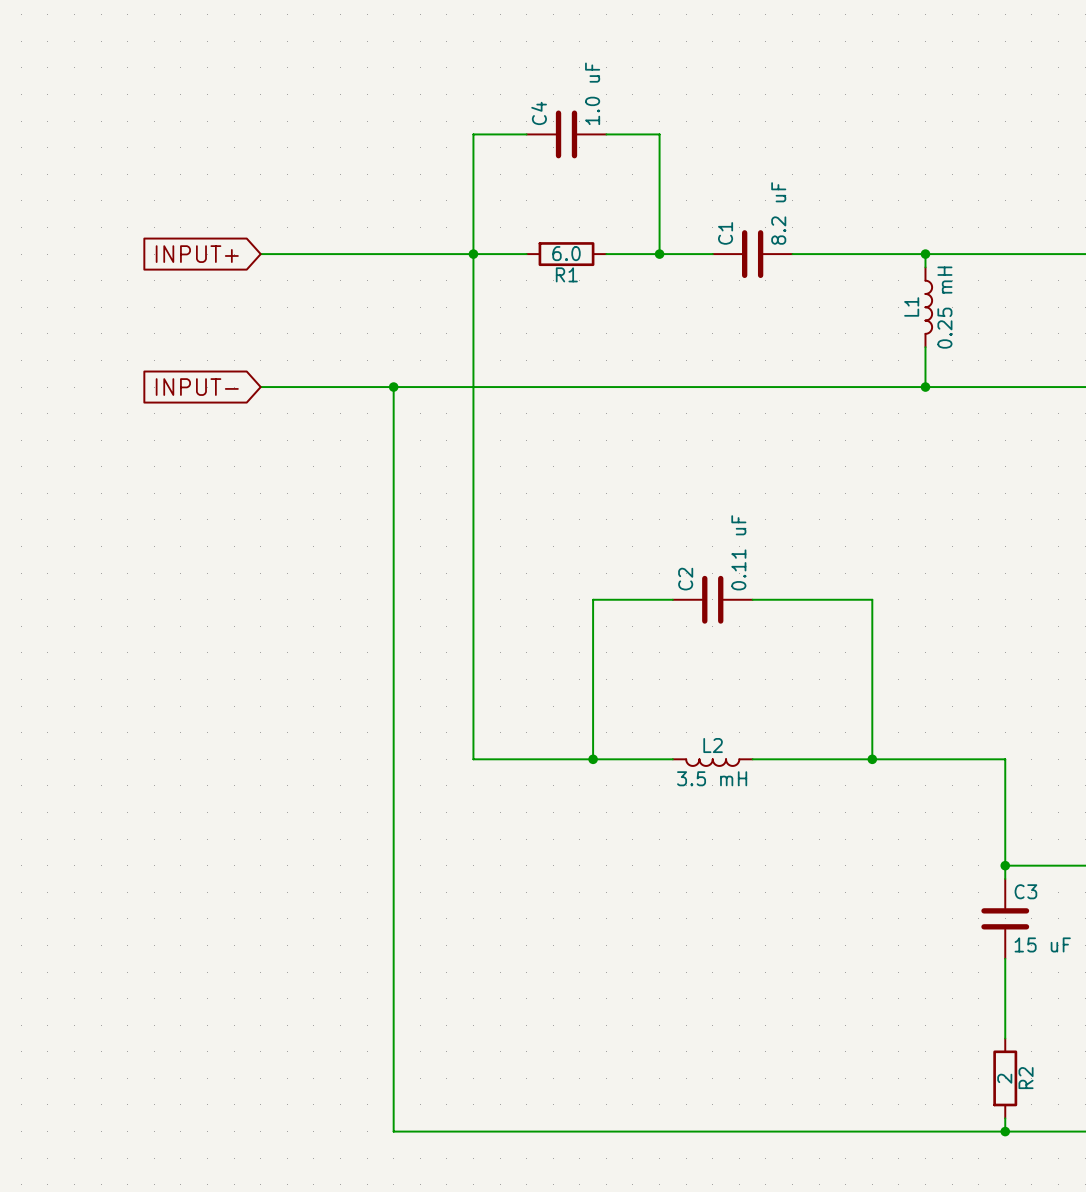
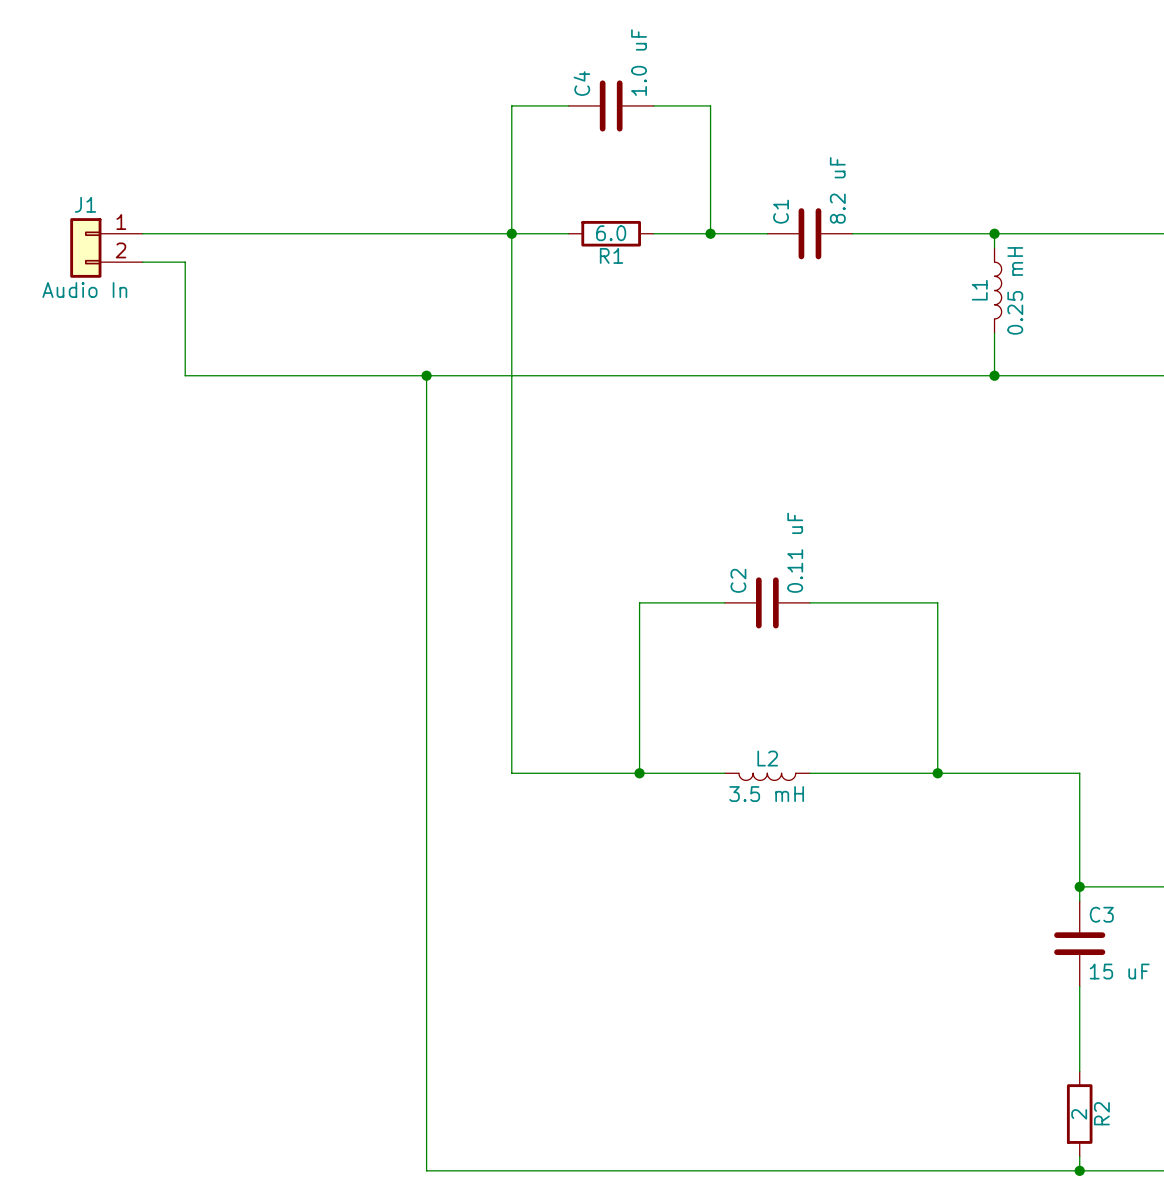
wire: none -> (142, 233) (284, 233)
global label: INPUT+ (197, 254) -> none
J1: none -> Audio In (106, 247)
wire: none -> (142, 262) (185, 262) (185, 375) (284, 375)
global label: INPUT- (197, 387) -> none

